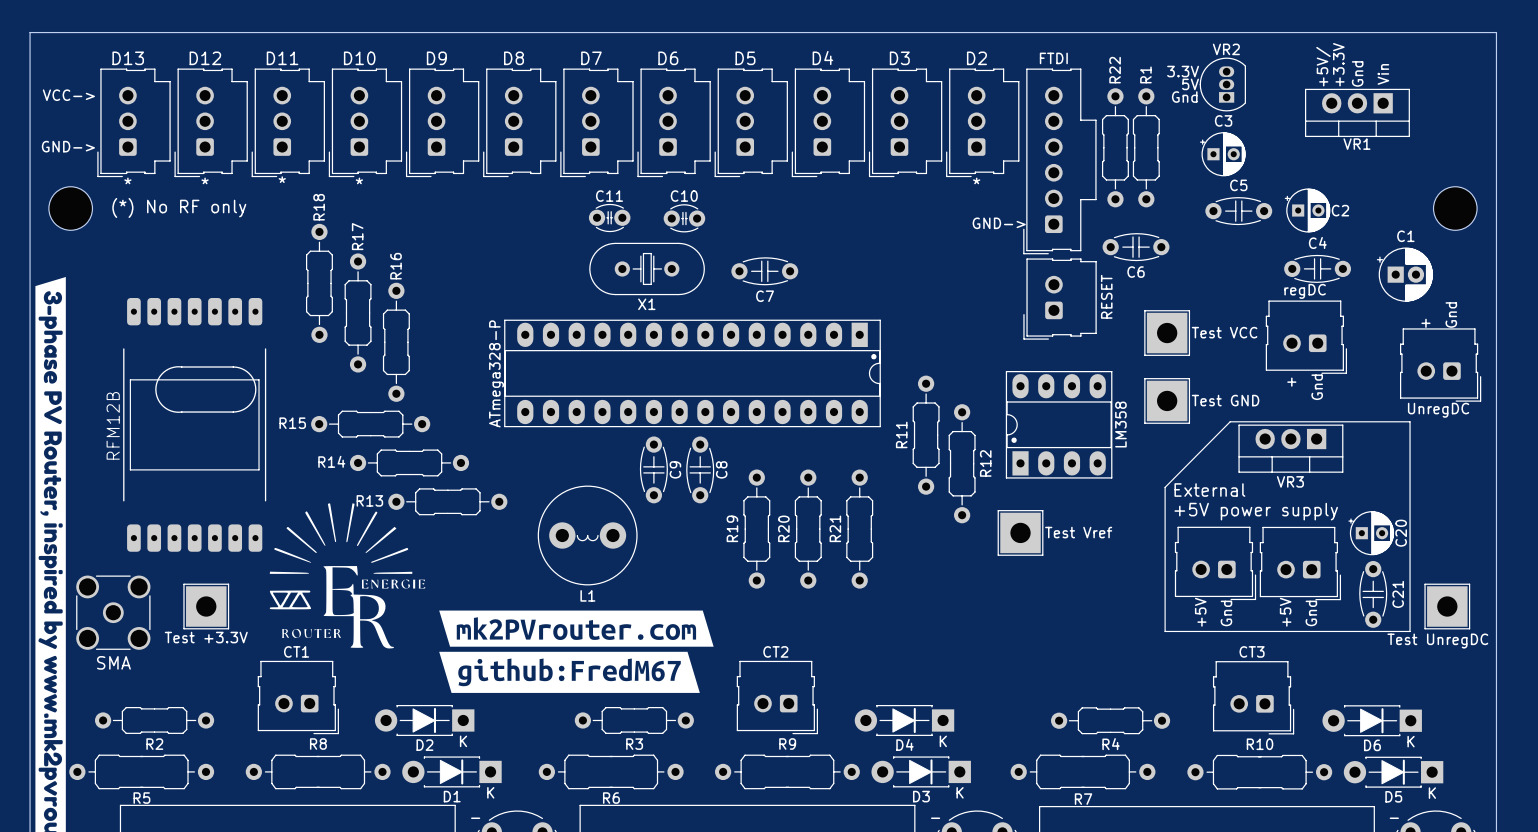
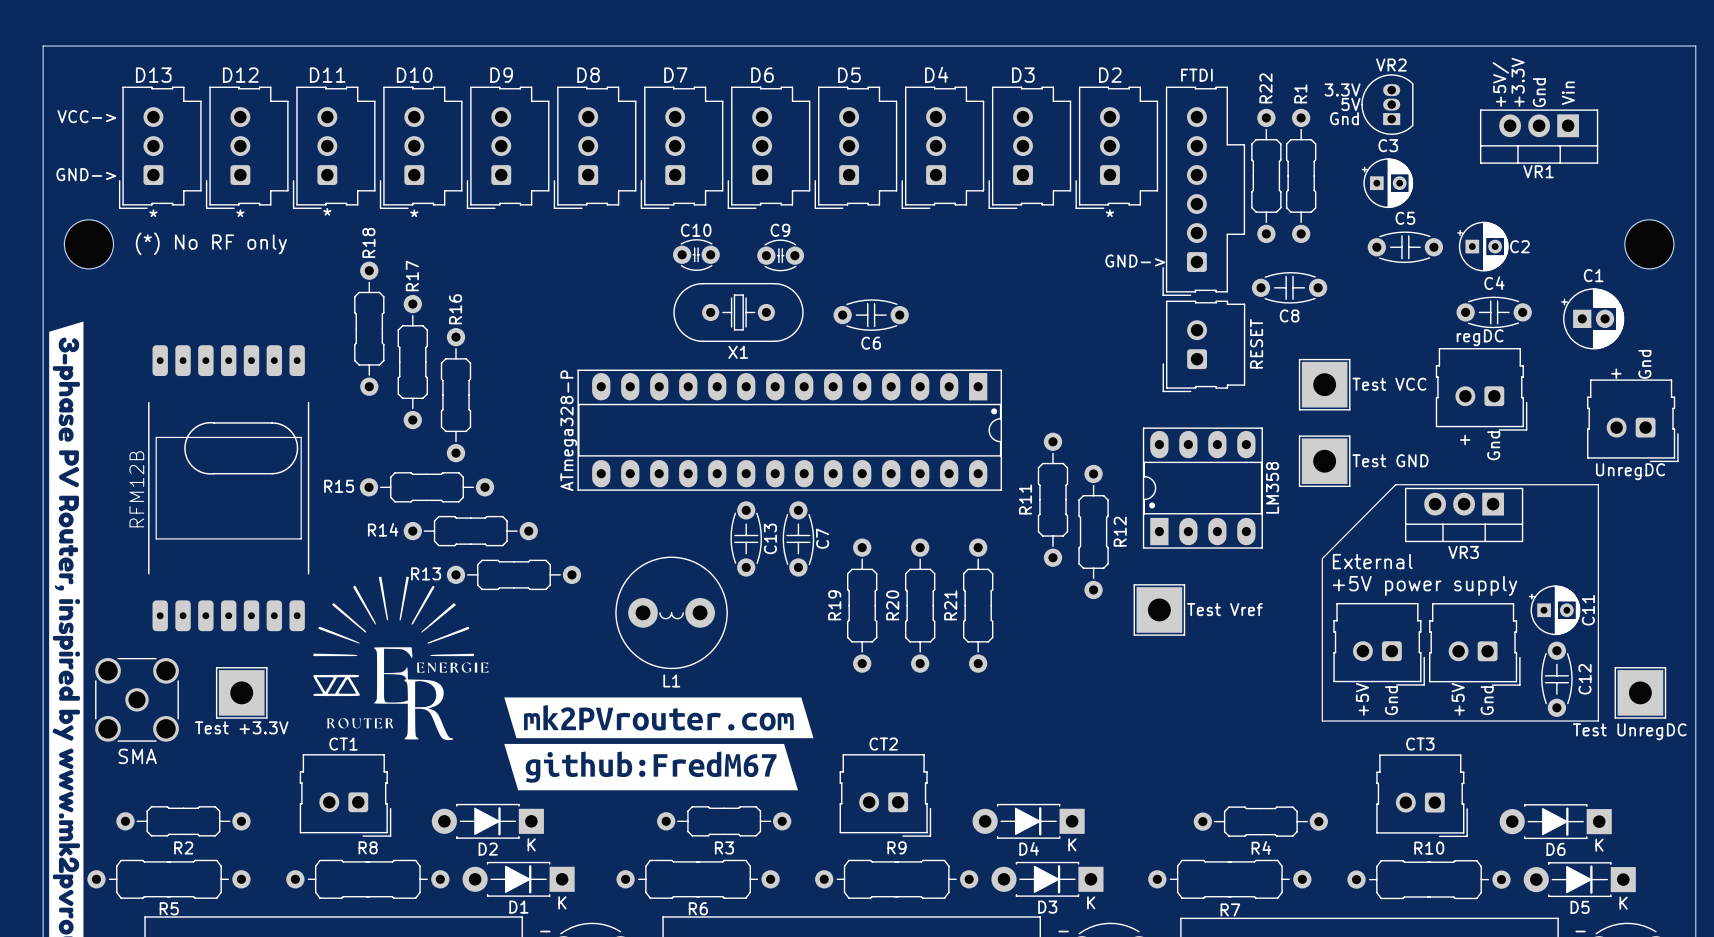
C11 name: C11 (609, 196) -> C10 (696, 230)
C10 name: C10 (684, 196) -> C9 (780, 230)
C6 name: C6 (1136, 272) -> C8 (1289, 315)
C7 name: C7 (765, 296) -> C6 (871, 343)
C9 name: C9 (675, 469) -> C13 (770, 538)
C8 name: C8 (721, 469) -> C7 (822, 538)
C20 name: C20 (1401, 533) -> C11 (1588, 610)
C21 name: C21 (1398, 594) -> C12 (1585, 679)

